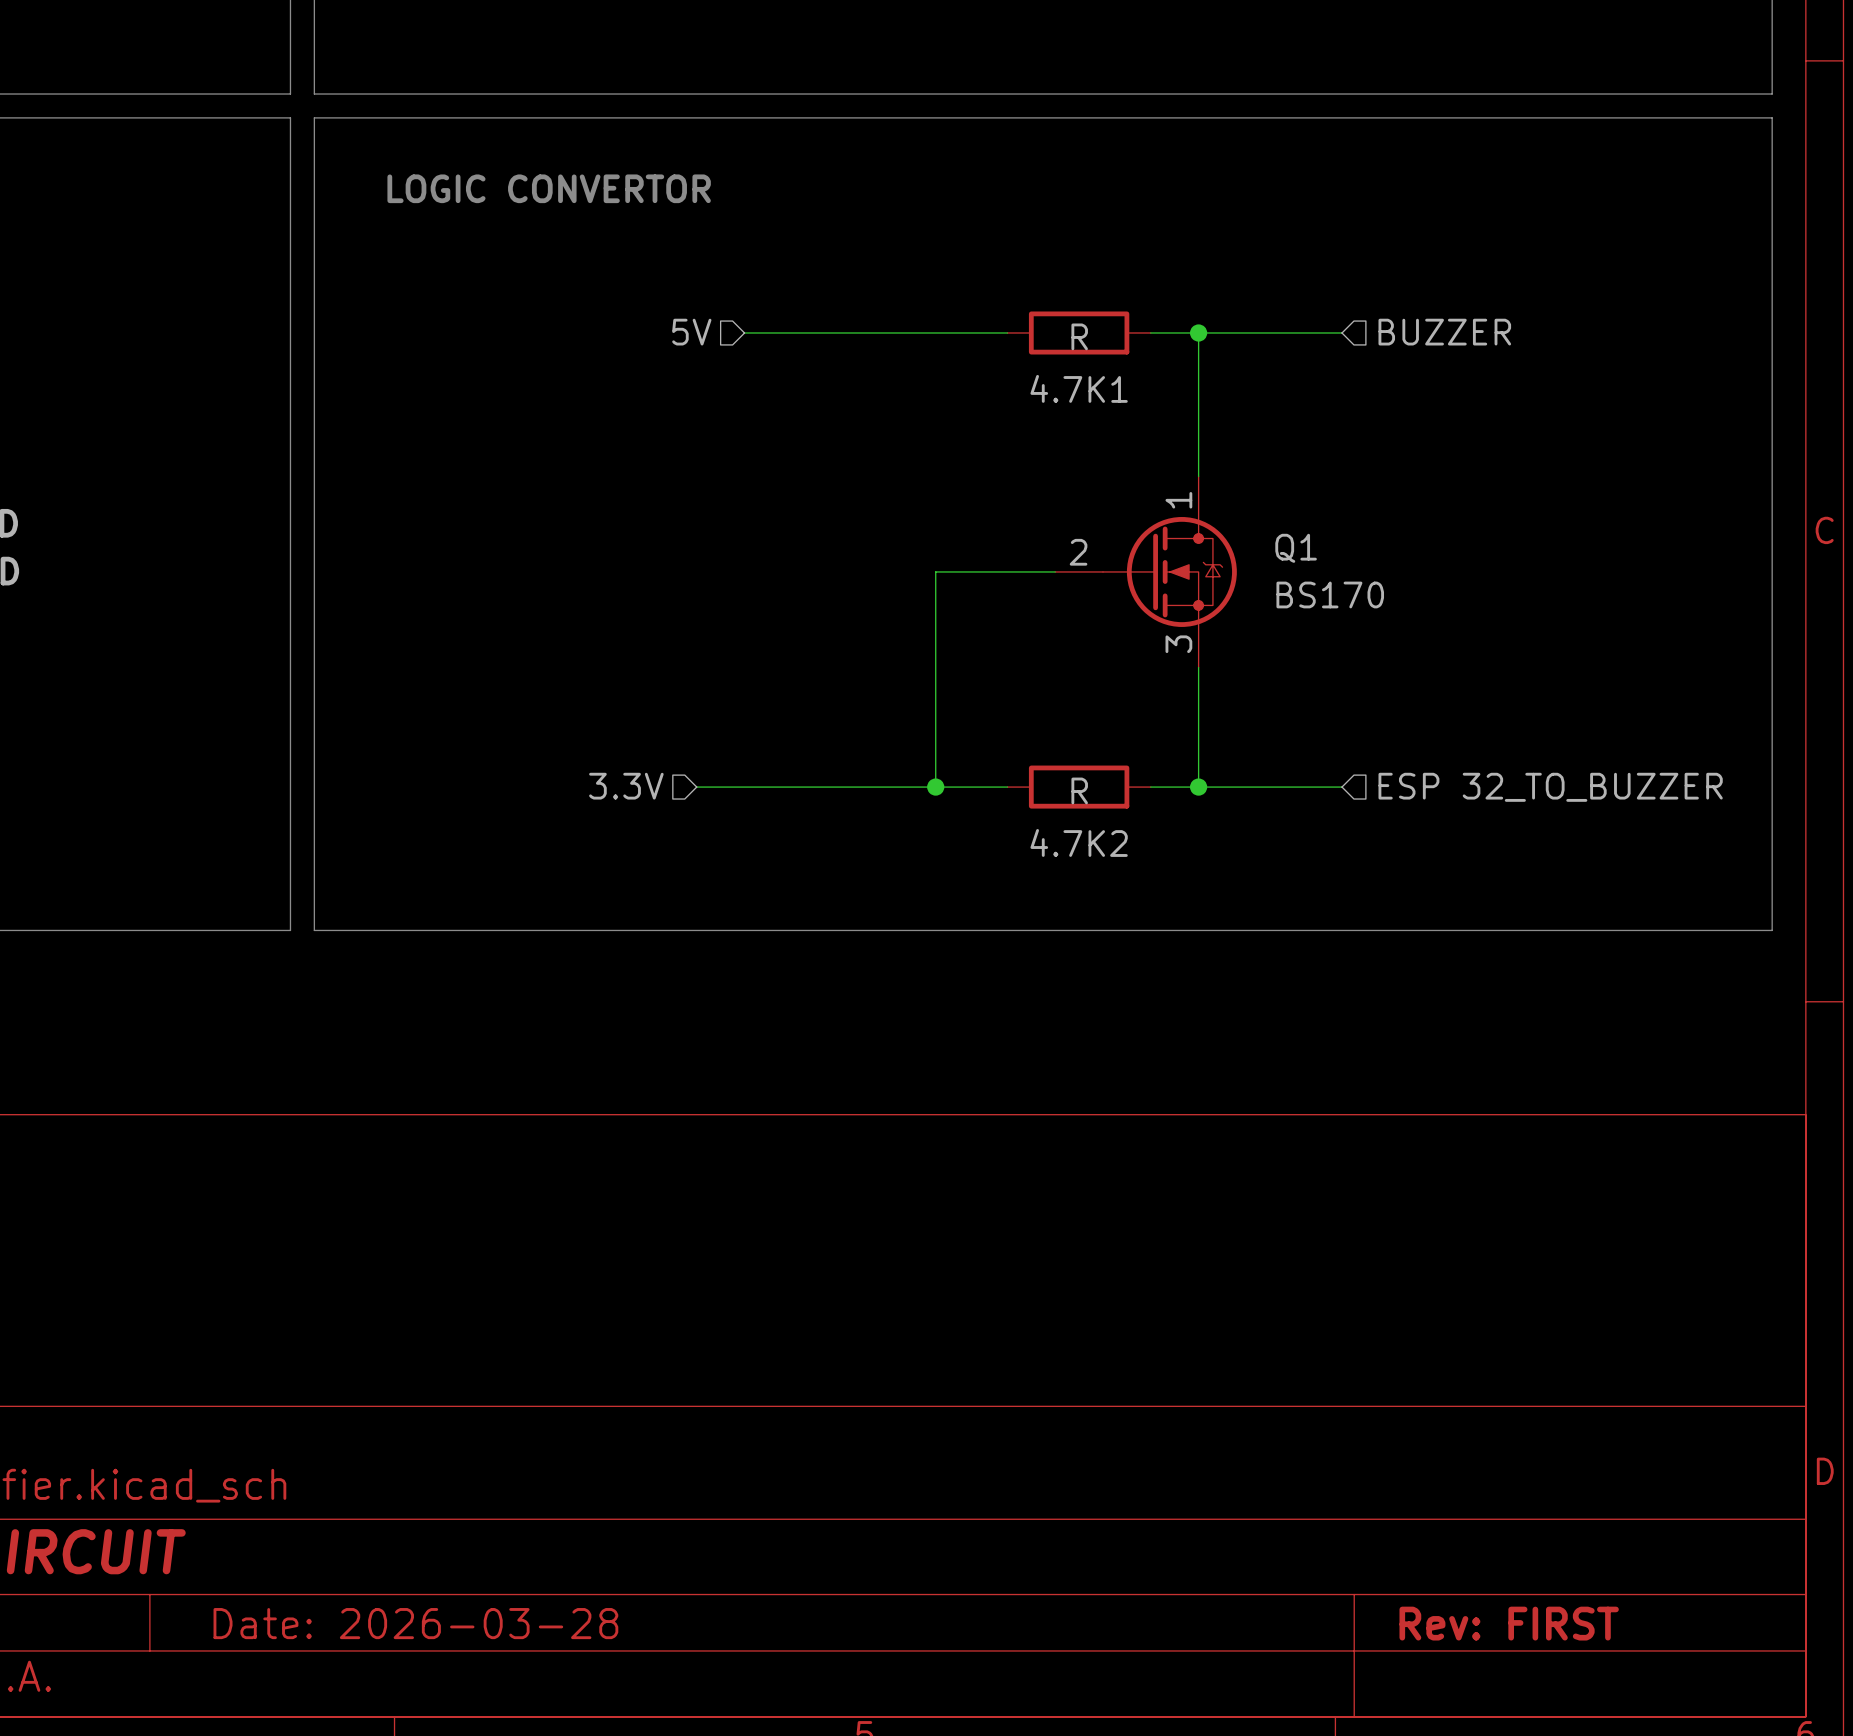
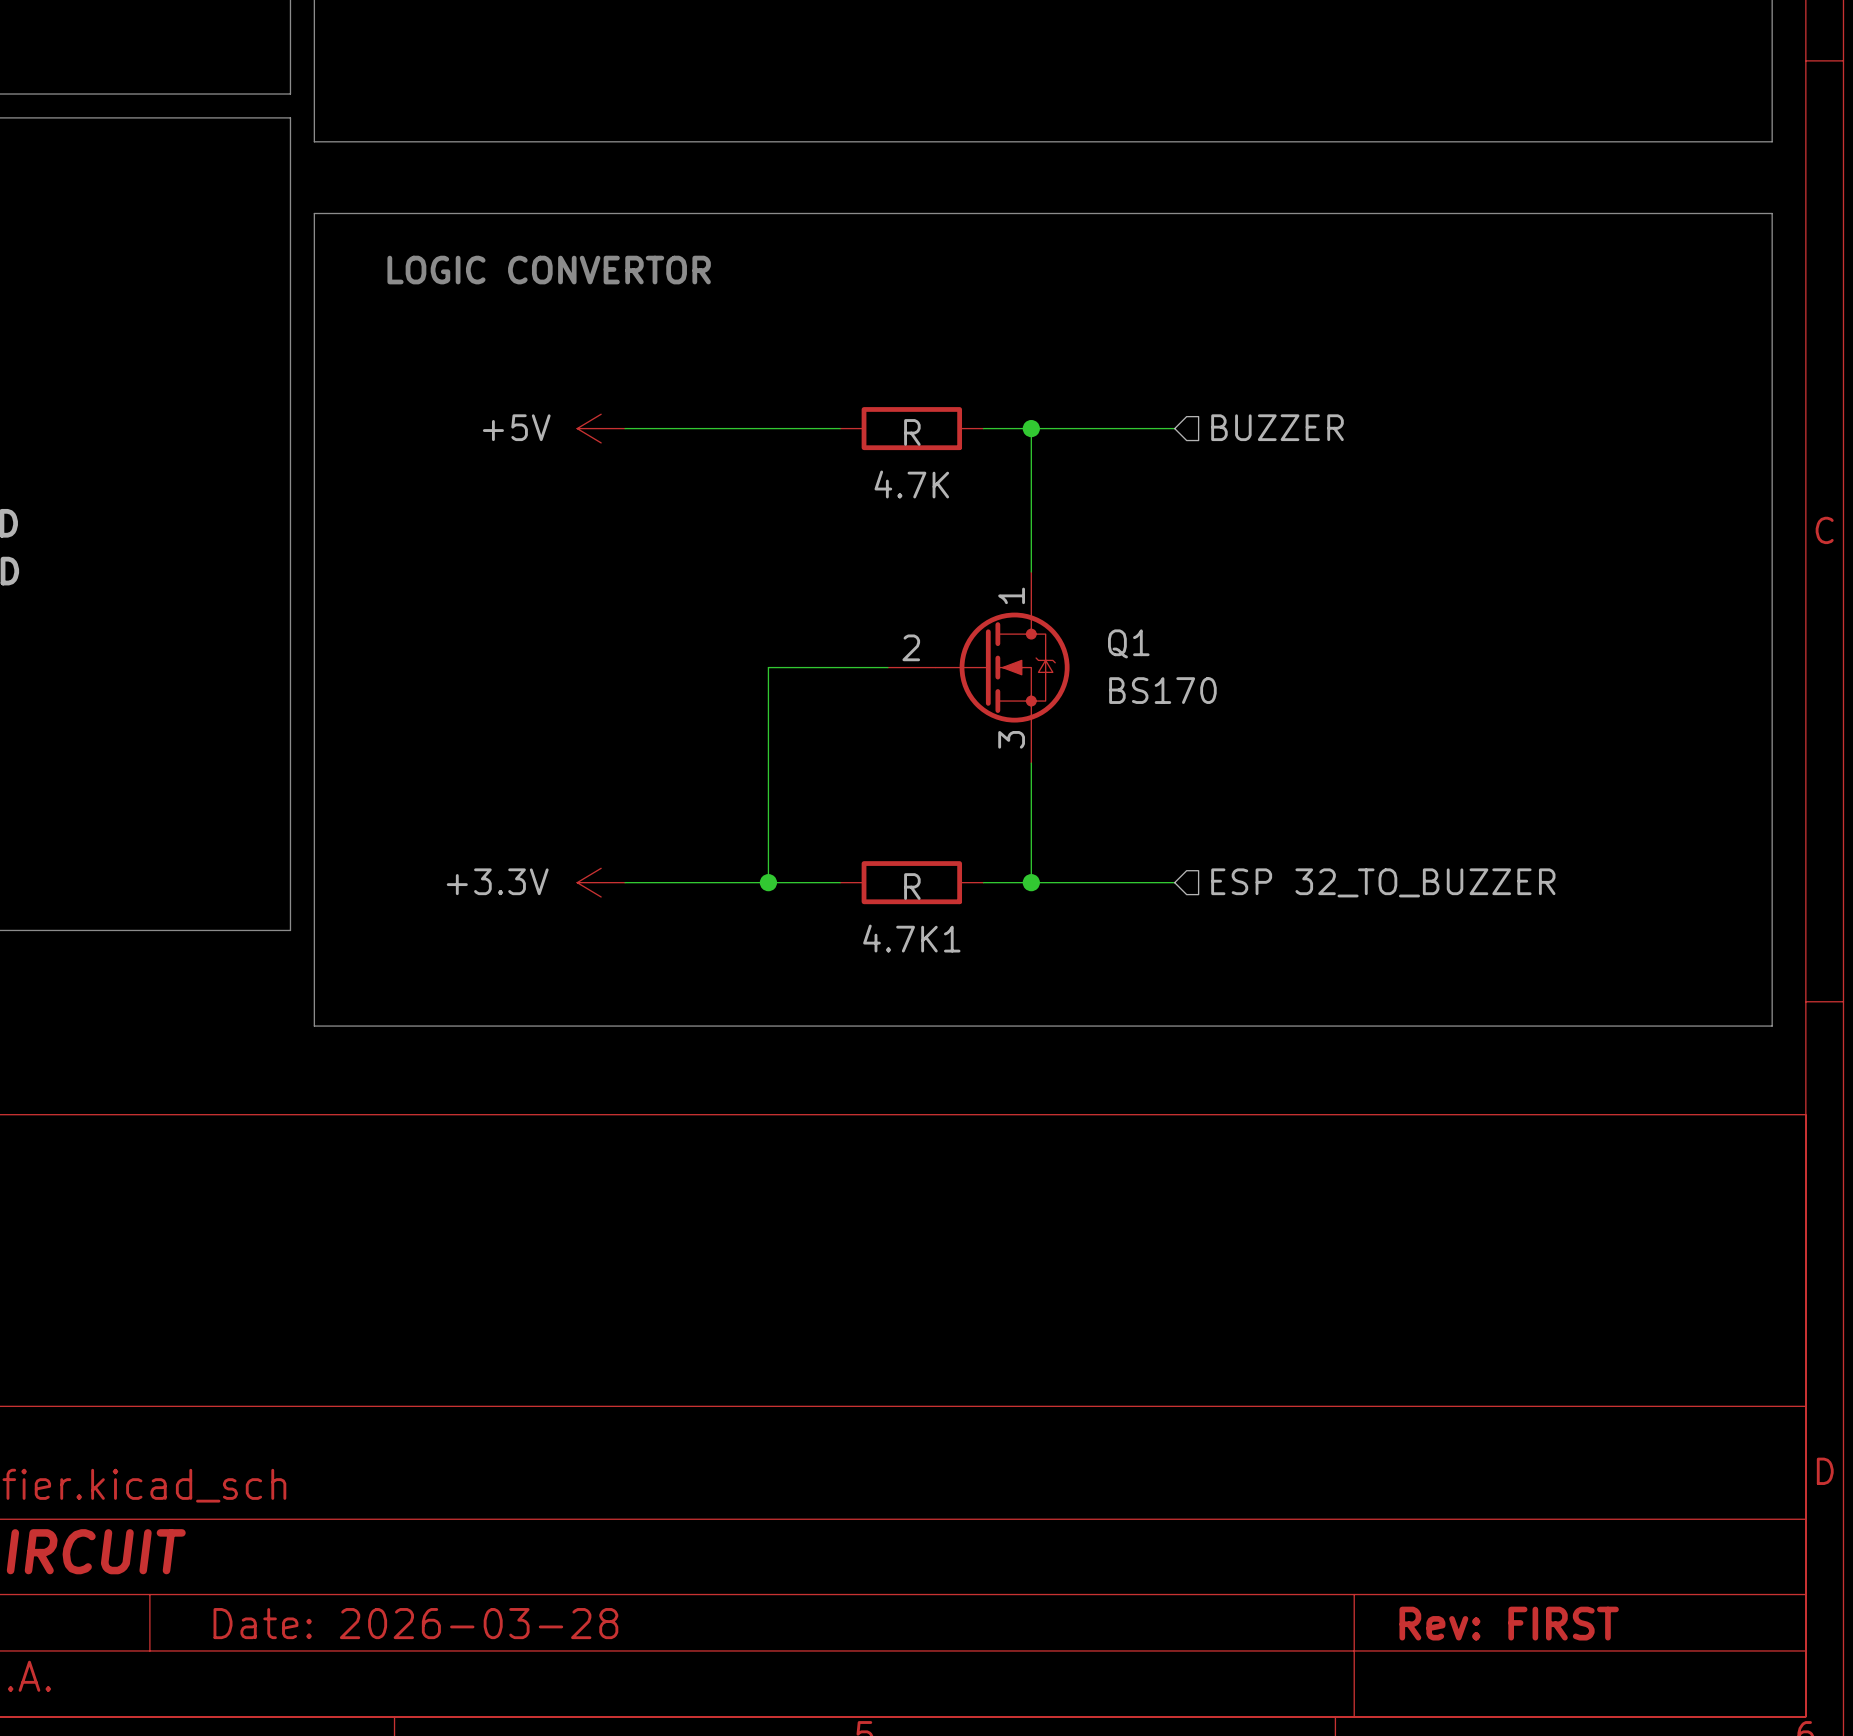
line: (314, 94) (1772, 94) -> (314, 94) (314, 117)
line: (314, 117) (1772, 117) -> (1772, 94) (1772, 117)
line: (314, 141) (314, 213) -> (314, 141) (1772, 141)
line: (1772, 141) (1772, 213) -> (314, 213) (1772, 213)
text position: LOGIC CONVERTOR (549, 188) -> LOGIC CONVERTOR (549, 270)
hierarchical label: 5V (691, 332) -> none
wire: (744, 332) (1007, 332) -> none
4.7K1 position: (1079, 332) -> (911, 882)
wire: (1150, 332) (1341, 332) -> (983, 428) (1174, 428)
wire: (1198, 332) (1198, 476) -> (1031, 428) (1031, 571)
junction: (1198, 332) -> none
hierarchical label position: BUZZER (1444, 332) -> BUZZER (1277, 427)
power symbol: none -> +5V (601, 428)
wire: none -> (625, 428) (840, 428)
4.7K: none -> R (911, 428)
junction: none -> (1031, 428)
wire: (1055, 571) (935, 571) (935, 787) -> (887, 667) (768, 667) (768, 882)
Q1 position: (1146, 571) -> (978, 667)
wire: (1198, 667) (1198, 787) -> (1031, 763) (1031, 882)
hierarchical label: 3.3V (626, 786) -> none
wire: (696, 787) (1007, 787) -> none
junction: (935, 787) -> none
4.7K2: R (1079, 787) -> none
wire: (1150, 787) (1341, 787) -> (983, 882) (1174, 882)
junction: (1198, 787) -> none
hierarchical label position: ESP 32_TO_BUZZER (1550, 787) -> ESP 32_TO_BUZZER (1383, 882)
power symbol: none -> +3.3V (601, 882)
wire: none -> (625, 882) (840, 882)
junction: none -> (768, 882)
junction: none -> (1031, 882)
line: (314, 930) (1772, 930) -> (314, 930) (314, 1026) (1772, 1026) (1772, 930)

